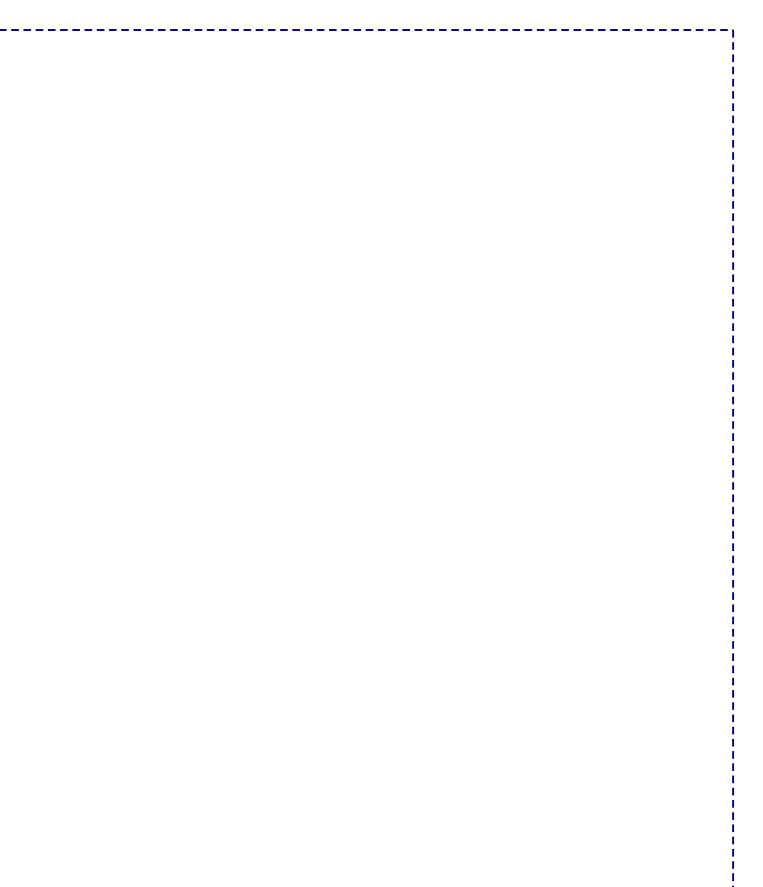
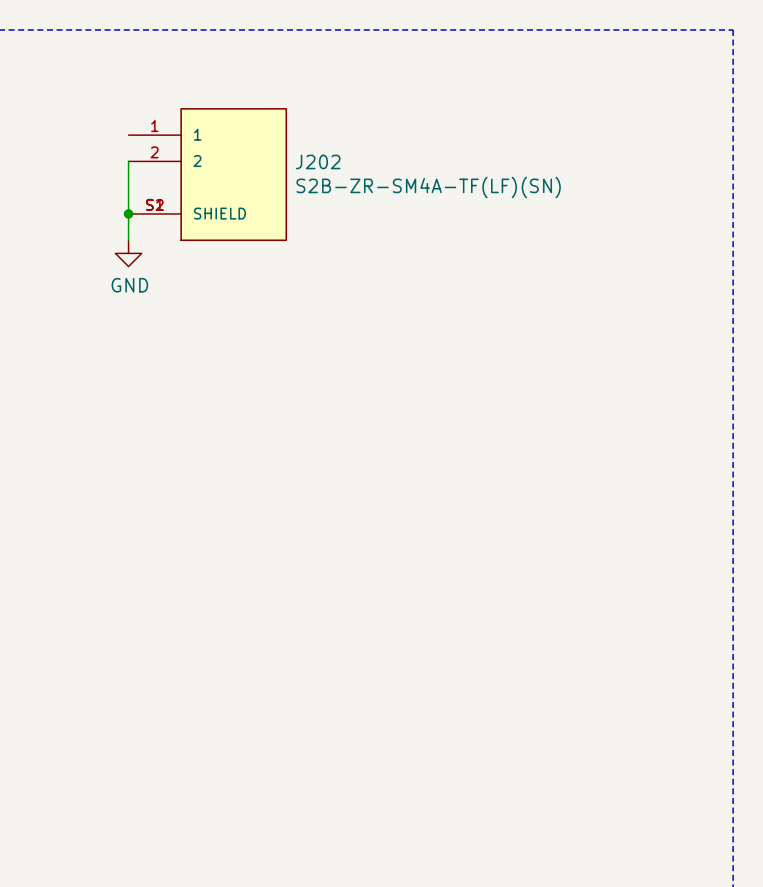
wire: none -> (128, 161) (128, 240)
J202: none -> S2B-ZR-SM4A-TF(LF)(SN) (207, 174)
junction: none -> (128, 213)
power symbol: none -> GND (128, 253)

